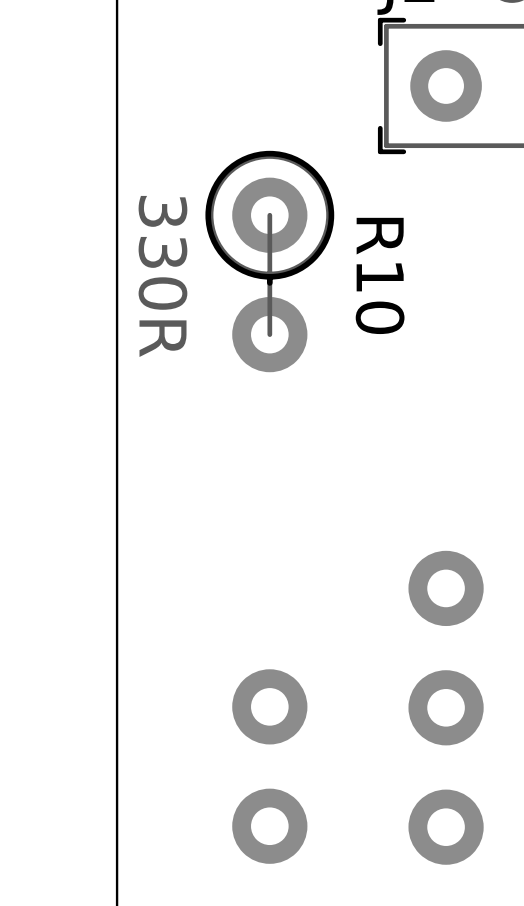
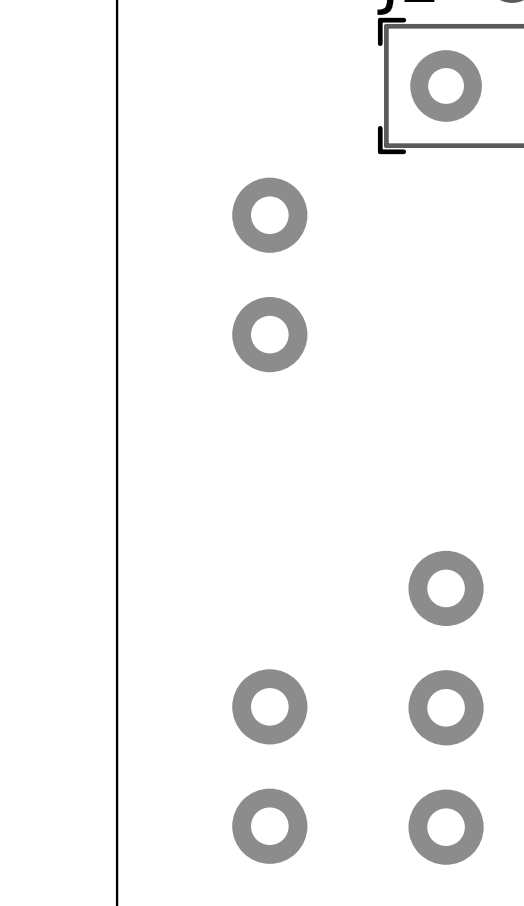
R10 side: bottom (269, 261) -> top (269, 274)

